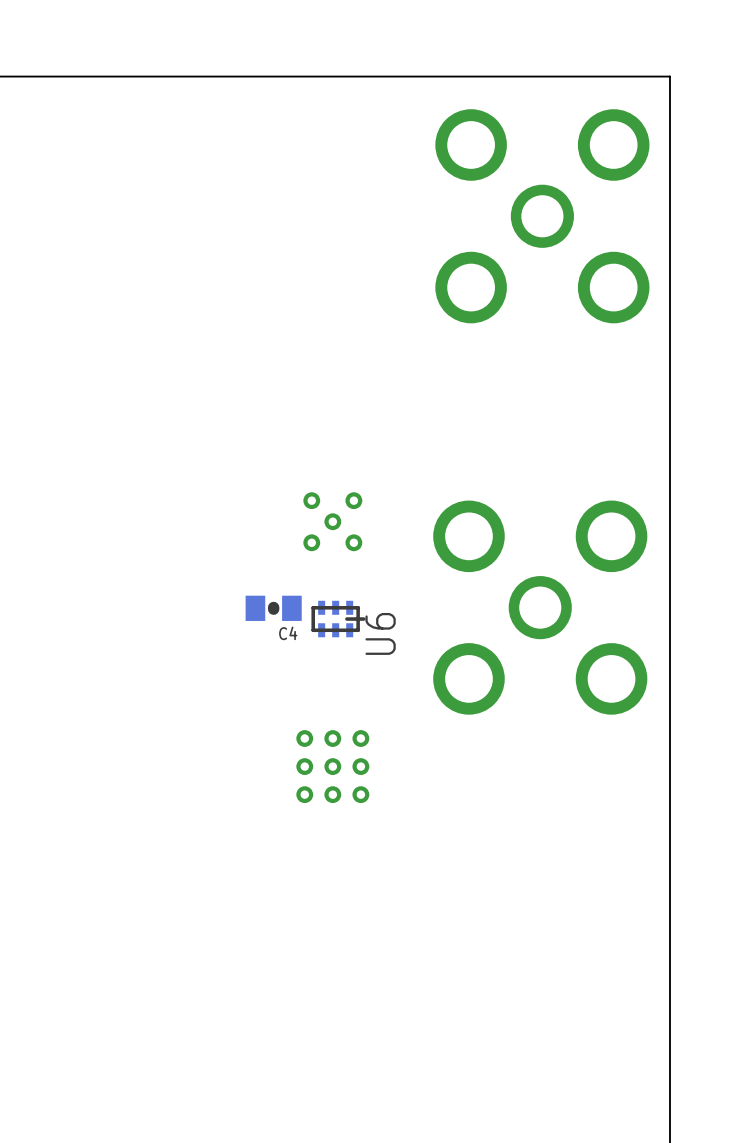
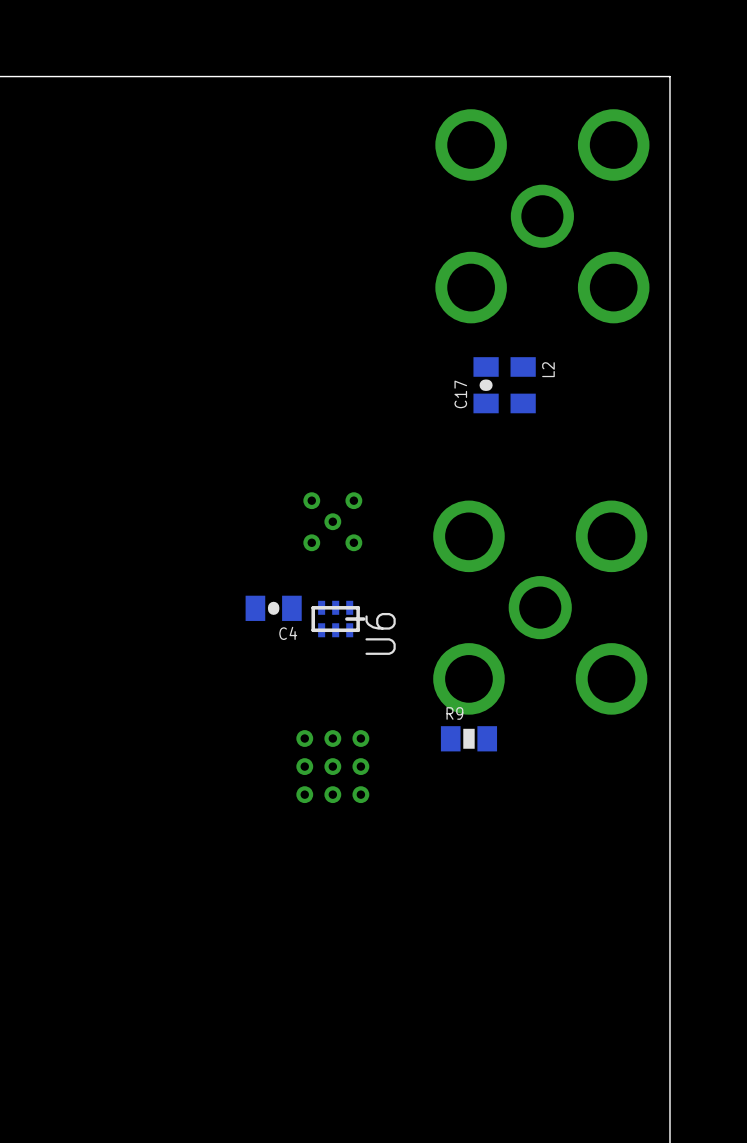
C17: none -> (486, 385)
L2: none -> (523, 385)
R9: none -> (468, 738)

